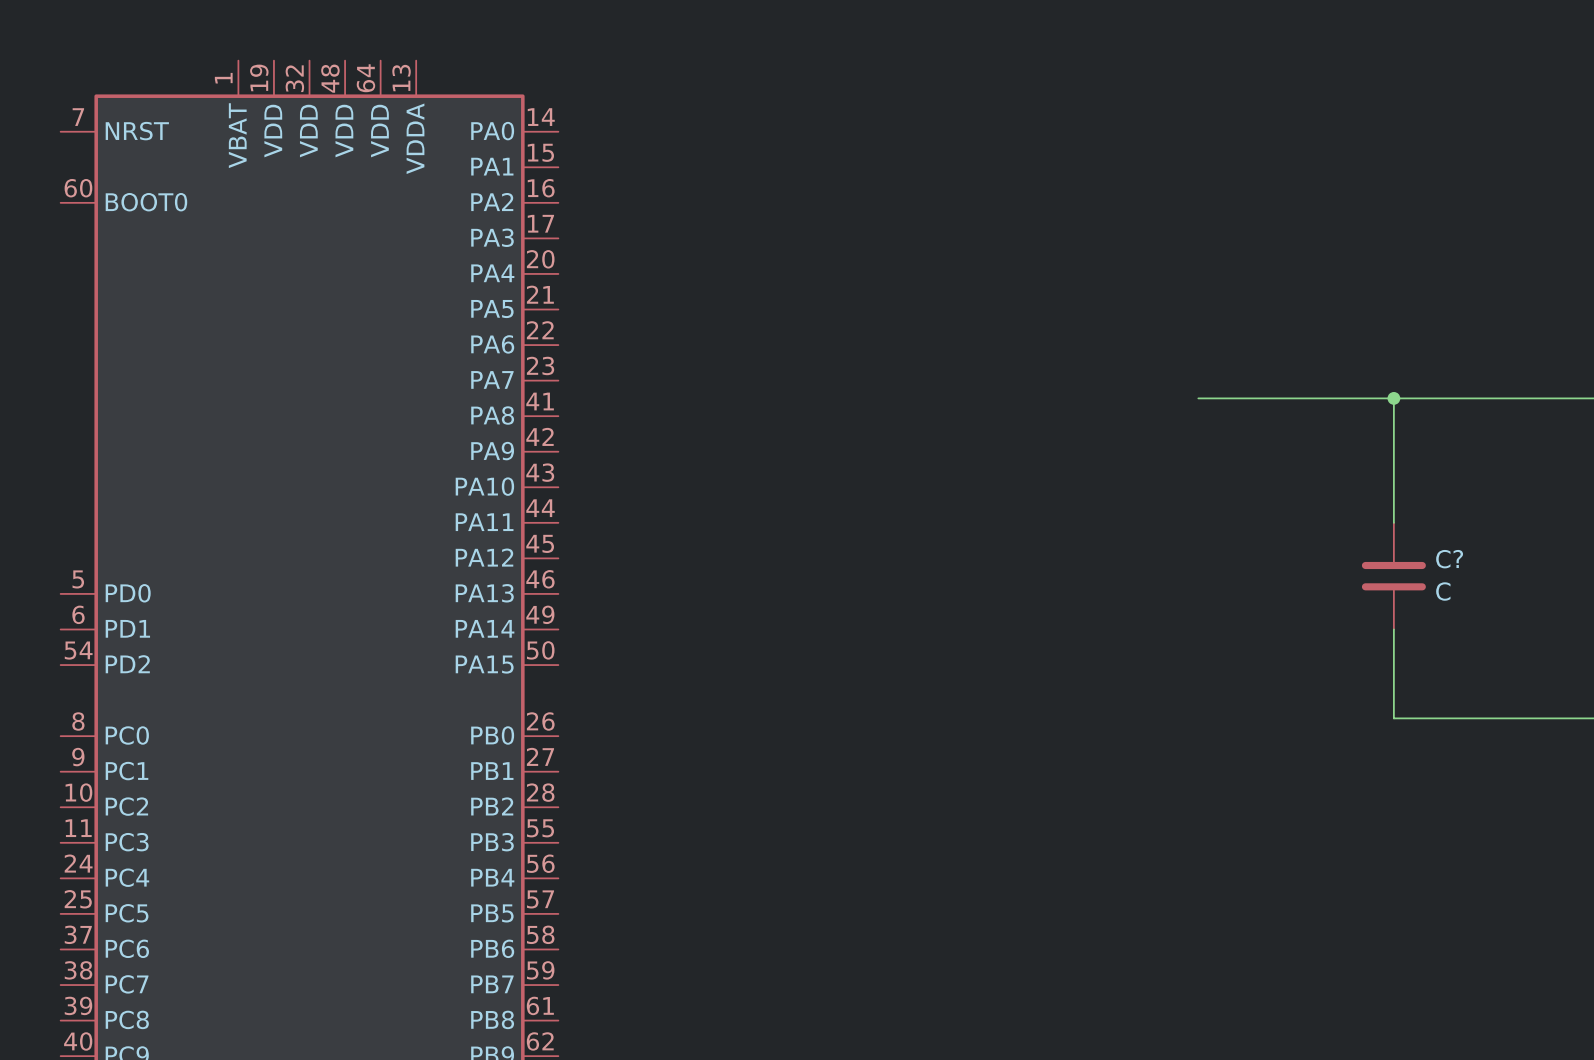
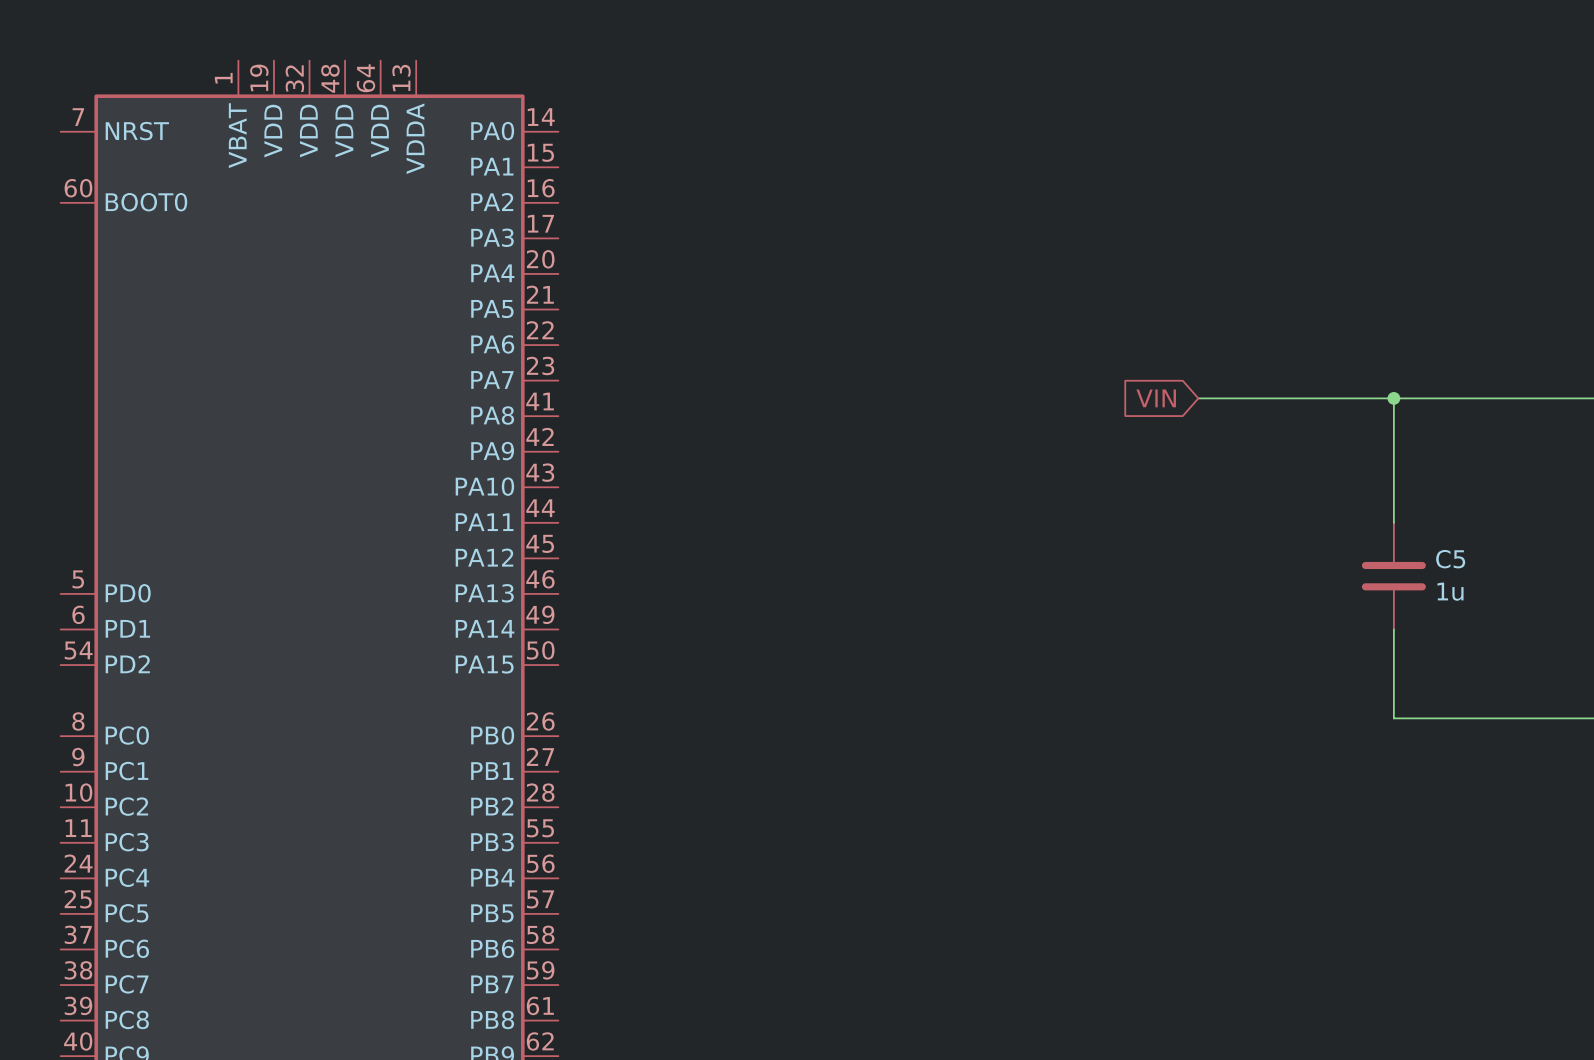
global label: none -> VIN (1156, 398)
C? name: C? (1449, 559) -> C5 (1450, 559)
C? value: C (1443, 591) -> 1u (1450, 591)

